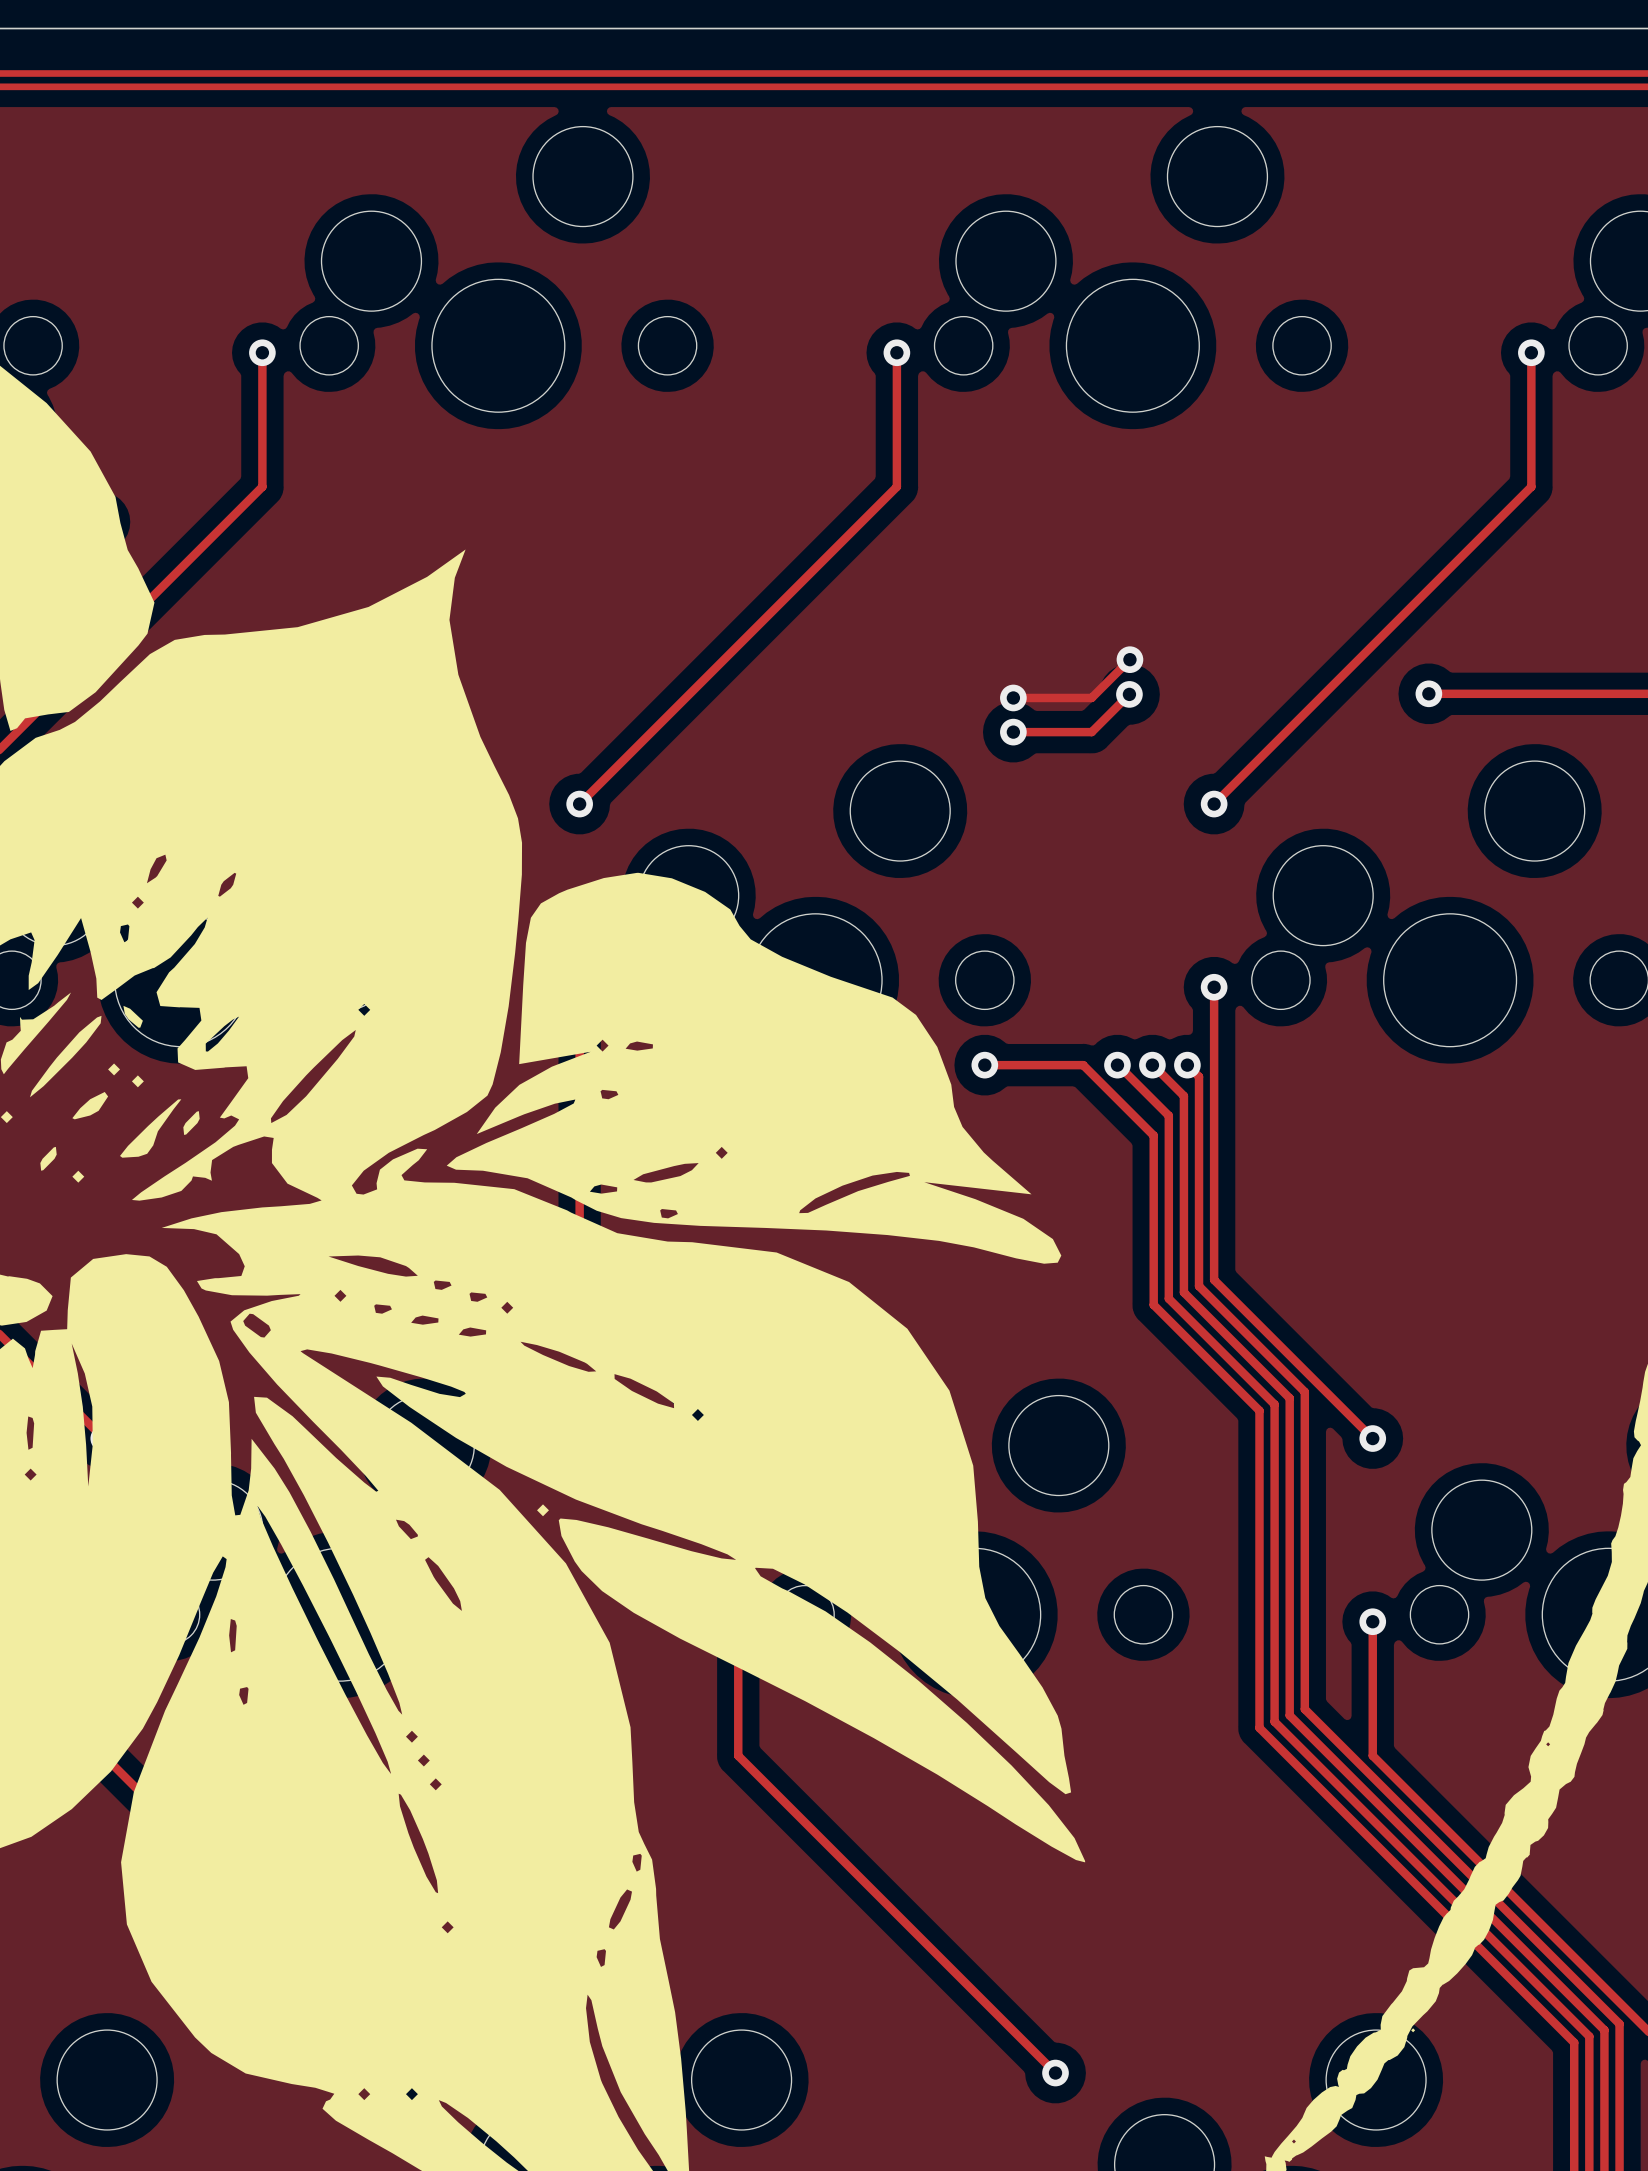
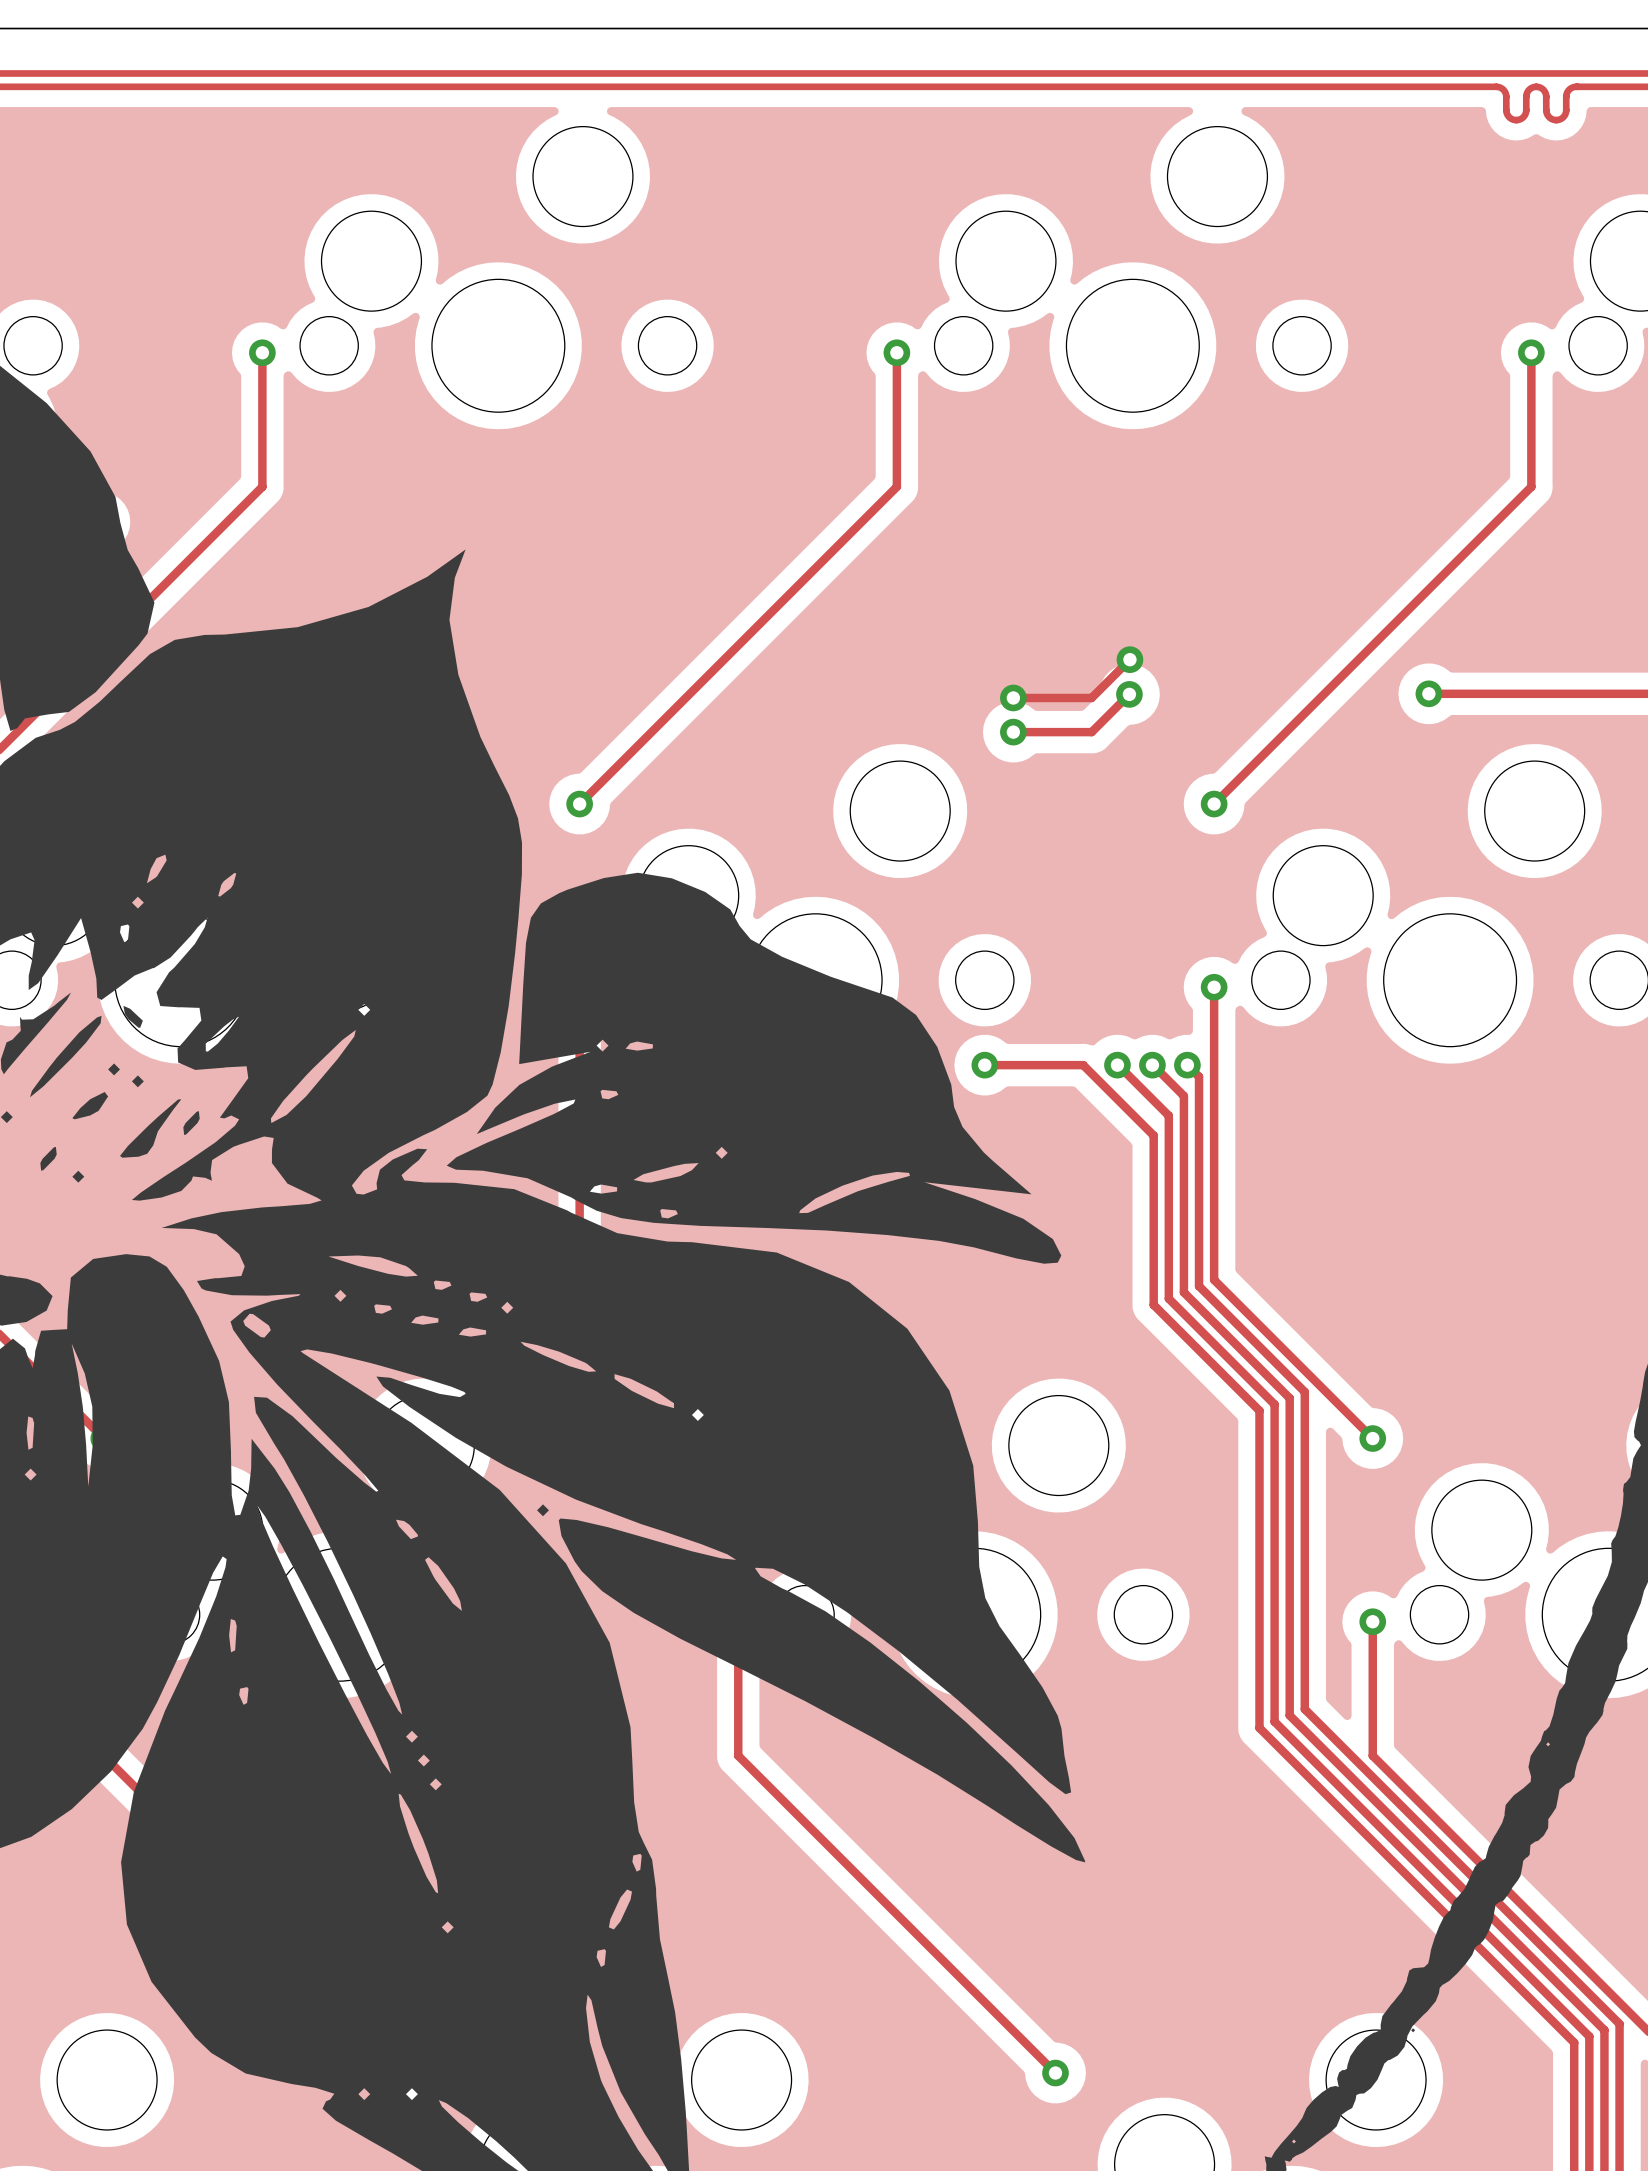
track: (1496, 86) (1576, 86) -> (1496, 86) (1502, 88) (1505, 92) (1507, 115) (1516, 120) (1521, 118) (1525, 113) (1526, 94) (1531, 88) (1537, 86) (1544, 90) (1547, 113) (1550, 118) (1556, 120) (1564, 115) (1567, 92) (1571, 88) (1576, 86)

